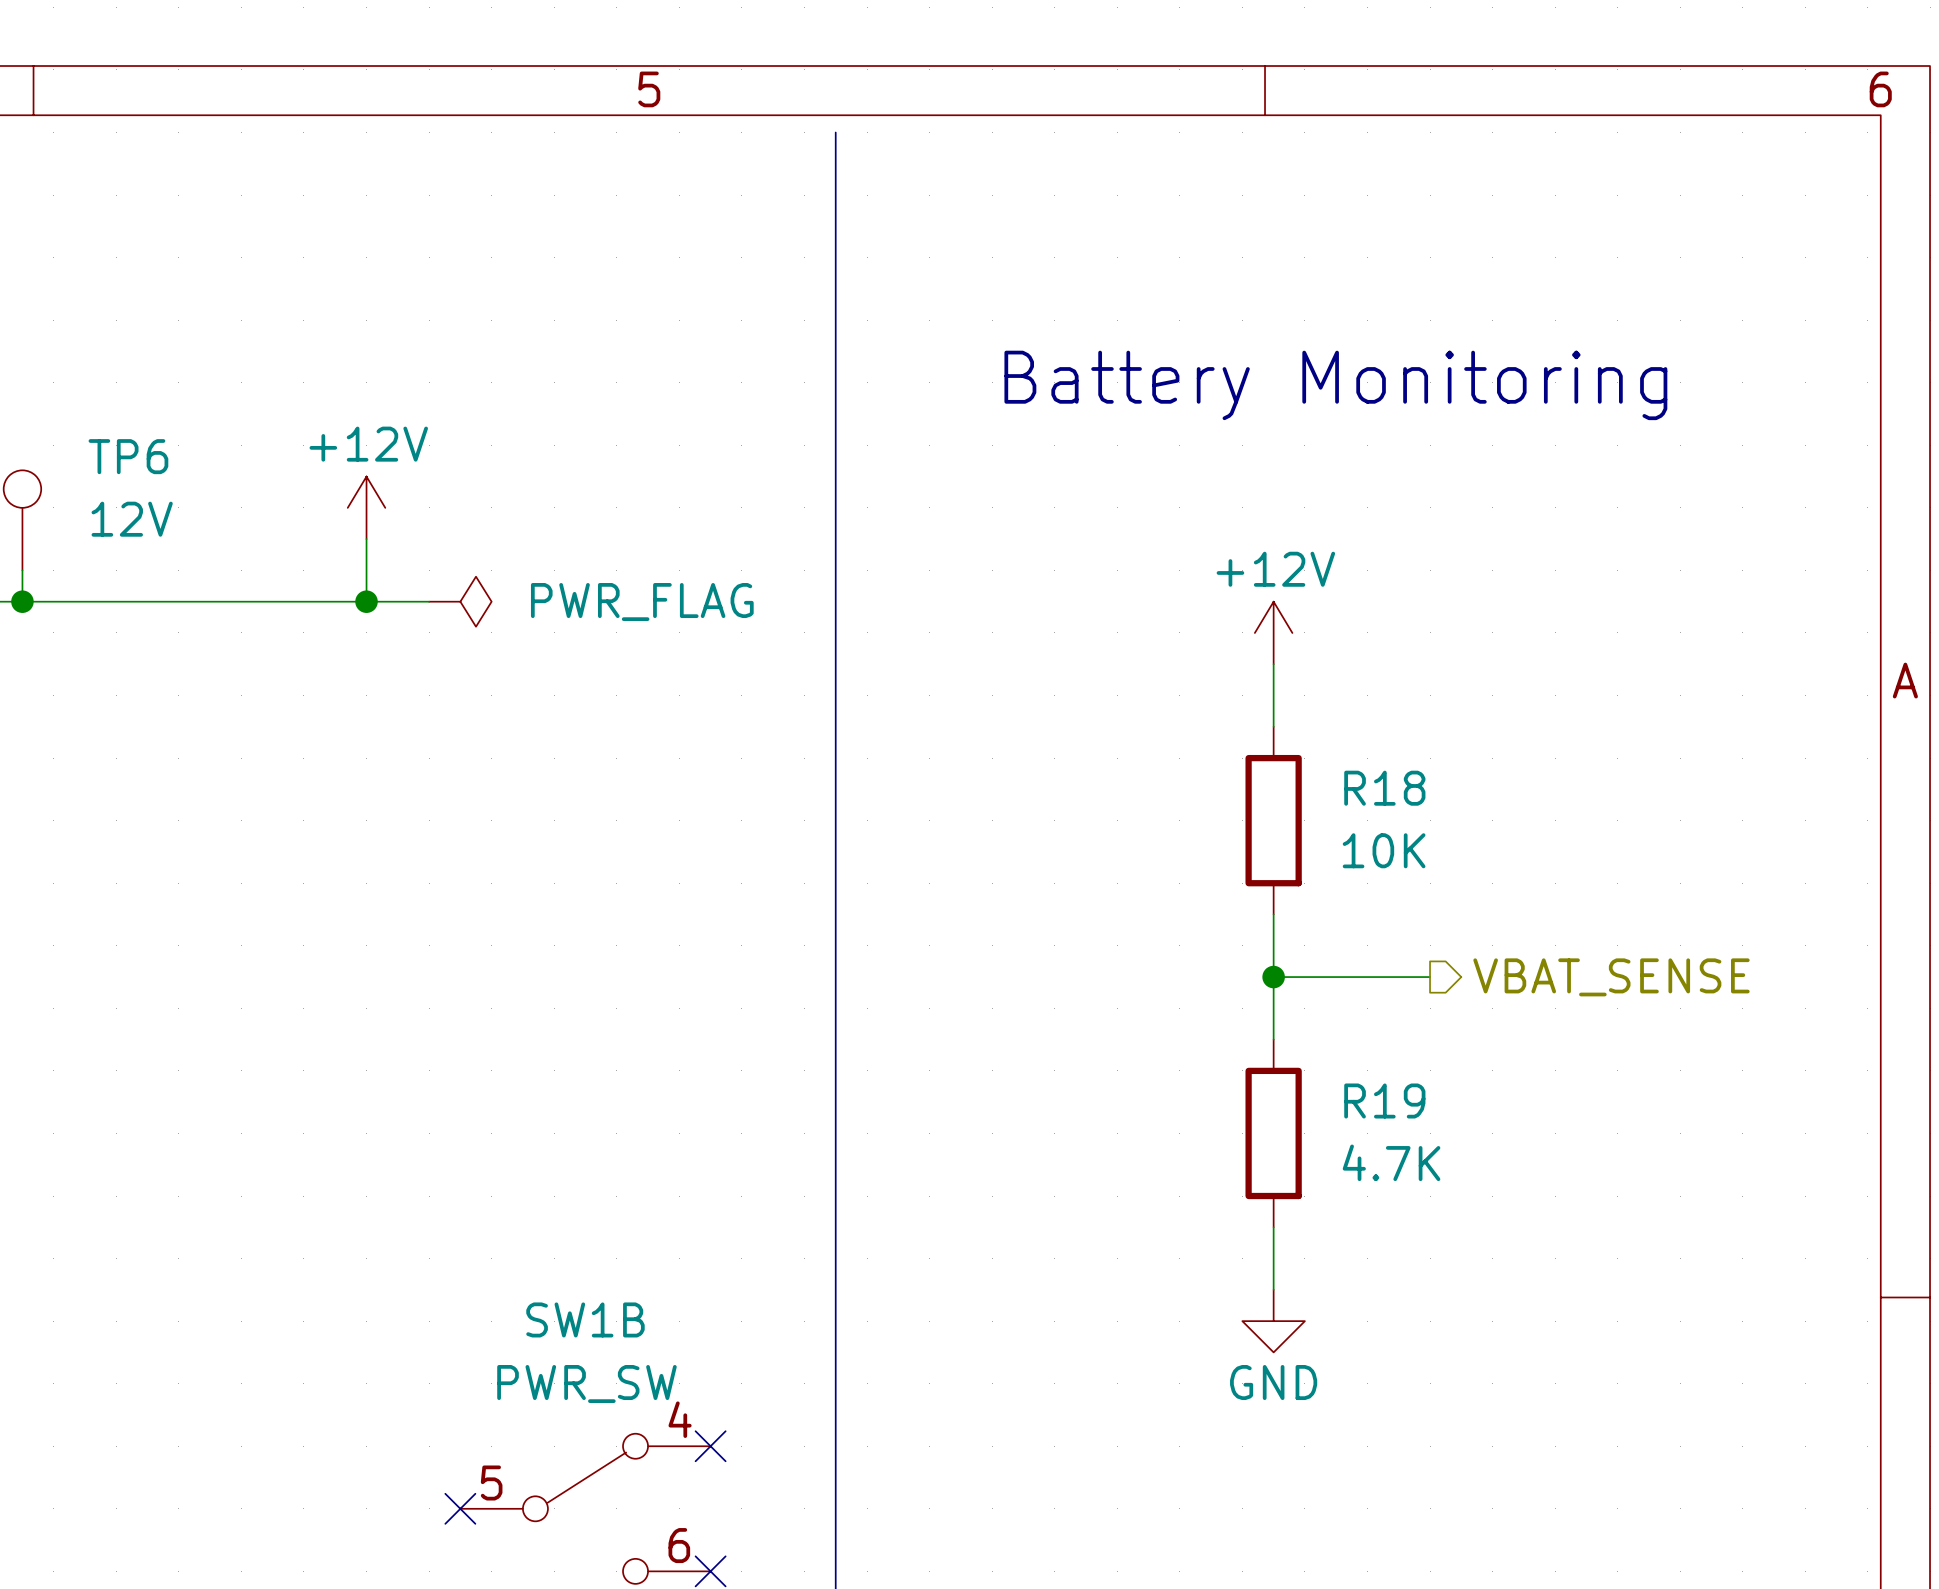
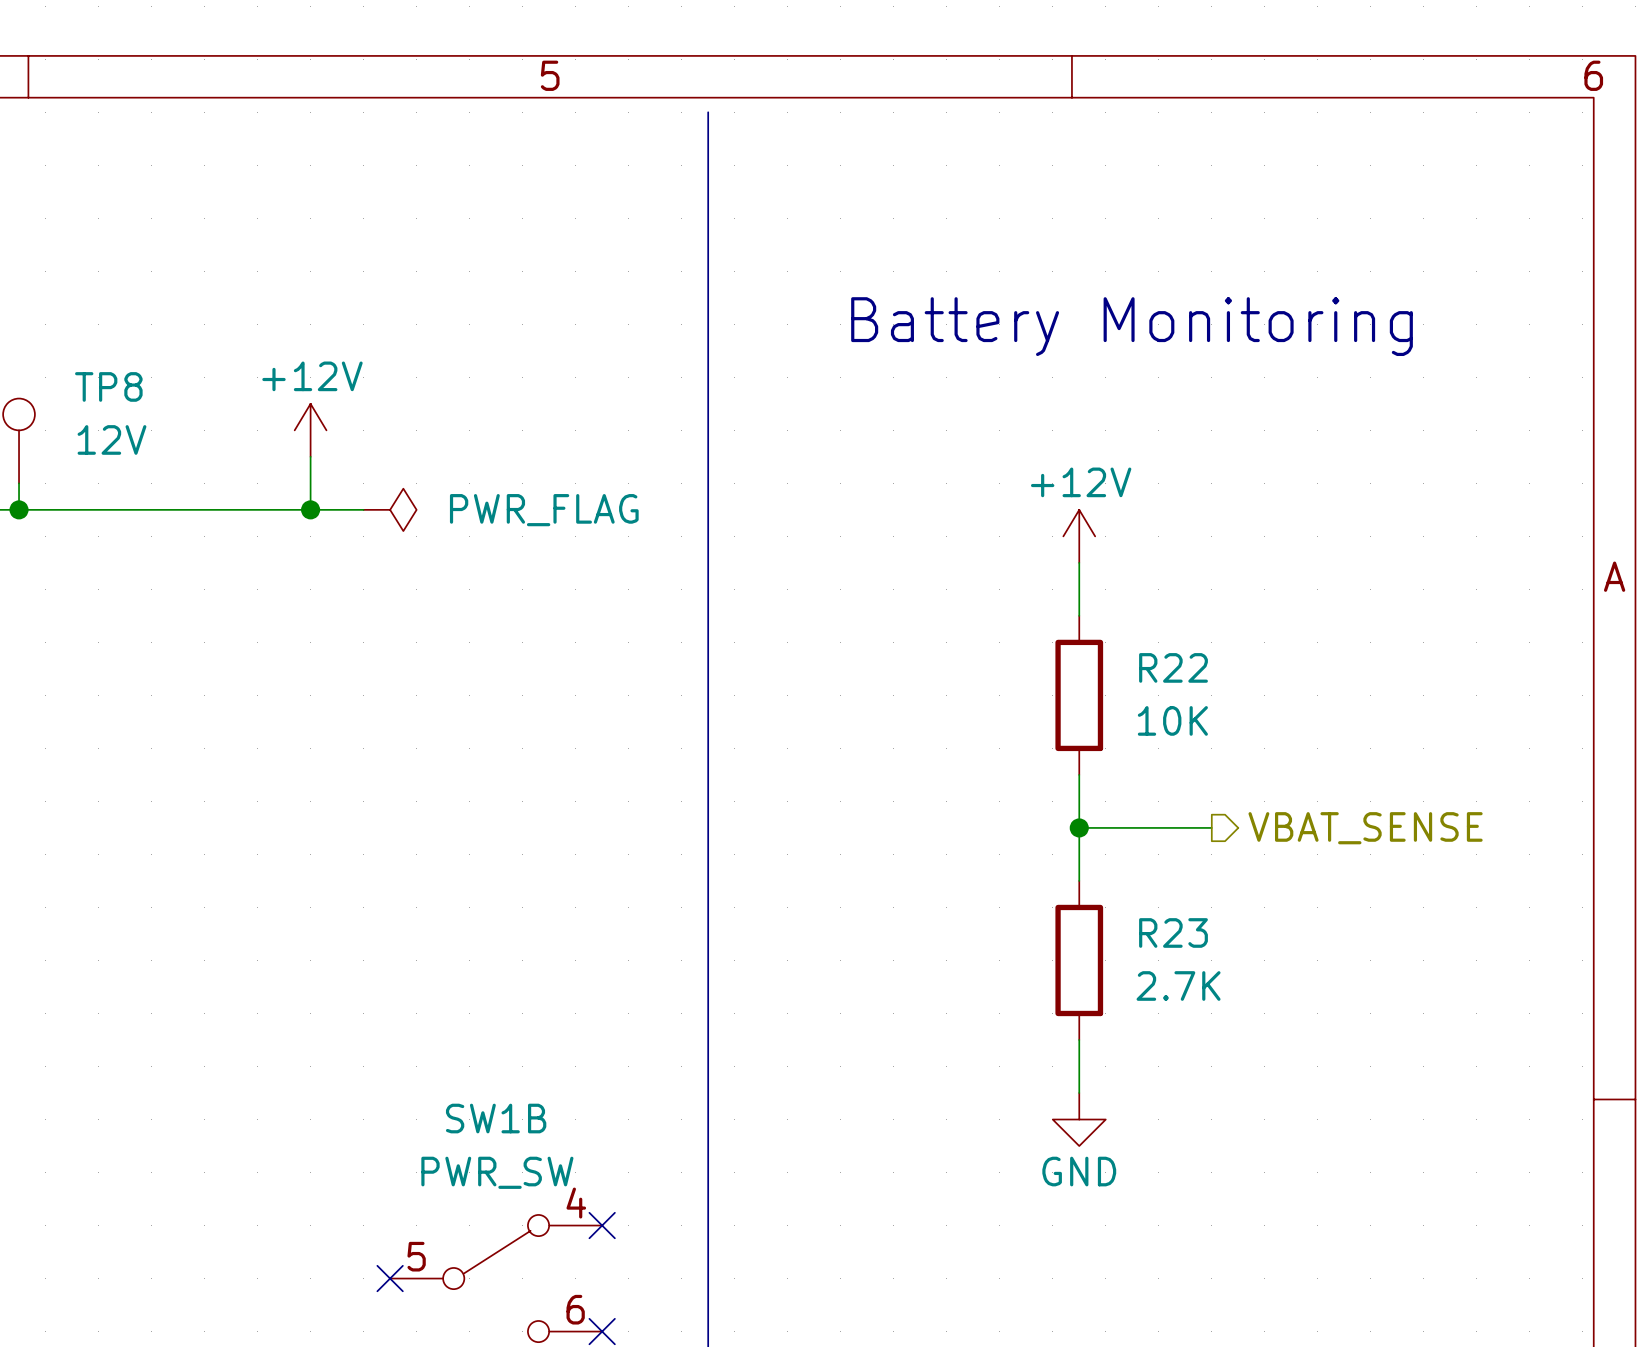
TP6 name: TP6 (128, 456) -> TP8 (108, 386)
R18 name: R18 (1384, 788) -> R22 (1173, 667)
R19 name: R19 (1384, 1101) -> R23 (1173, 932)
R19 value: 4.7K (1391, 1162) -> 2.7K (1178, 985)

